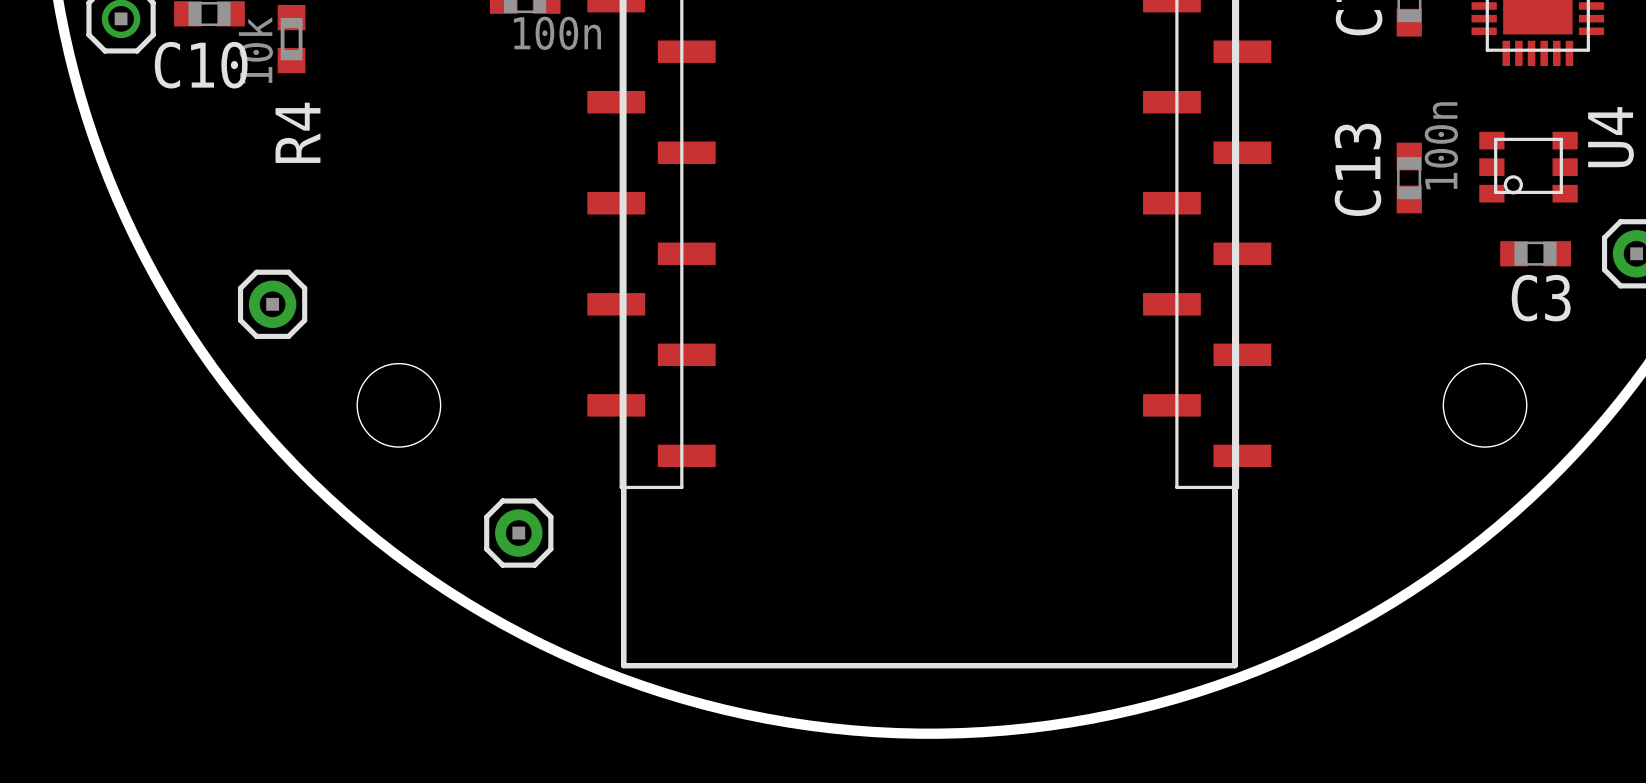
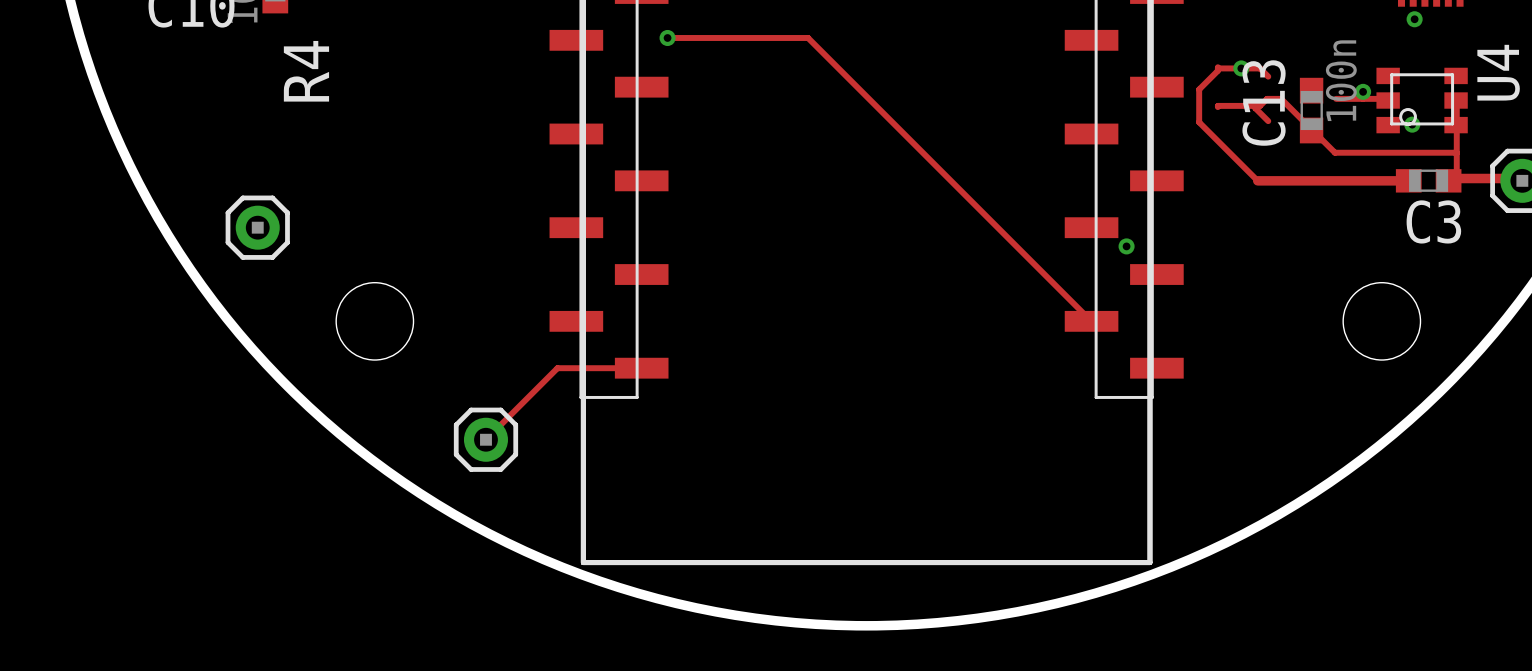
via: none -> (1414, 19)
track: none -> (667, 37) (808, 37) (1091, 321)
via: none -> (667, 37)
track: none -> (1217, 67) (1217, 70) (1199, 89) (1199, 122) (1257, 180) (1408, 180)
R4 name position: R4 (297, 132) -> R4 (306, 71)
track: none -> (1217, 68) (1260, 68) (1268, 76)
via: none -> (1241, 68)
via: none -> (1363, 91)
track: none -> (1336, 98) (1386, 98) (1388, 100)
track: none -> (1456, 100) (1456, 178)
track: none -> (1255, 105) (1255, 108) (1268, 121)
track: none -> (1217, 107) (1260, 105) (1267, 98) (1281, 98) (1335, 152) (1456, 152)
via: none -> (1412, 124)
track: none -> (1456, 178) (1522, 178) (1522, 180)
via: none -> (1126, 246)
track: none -> (641, 368) (557, 368) (485, 439)

